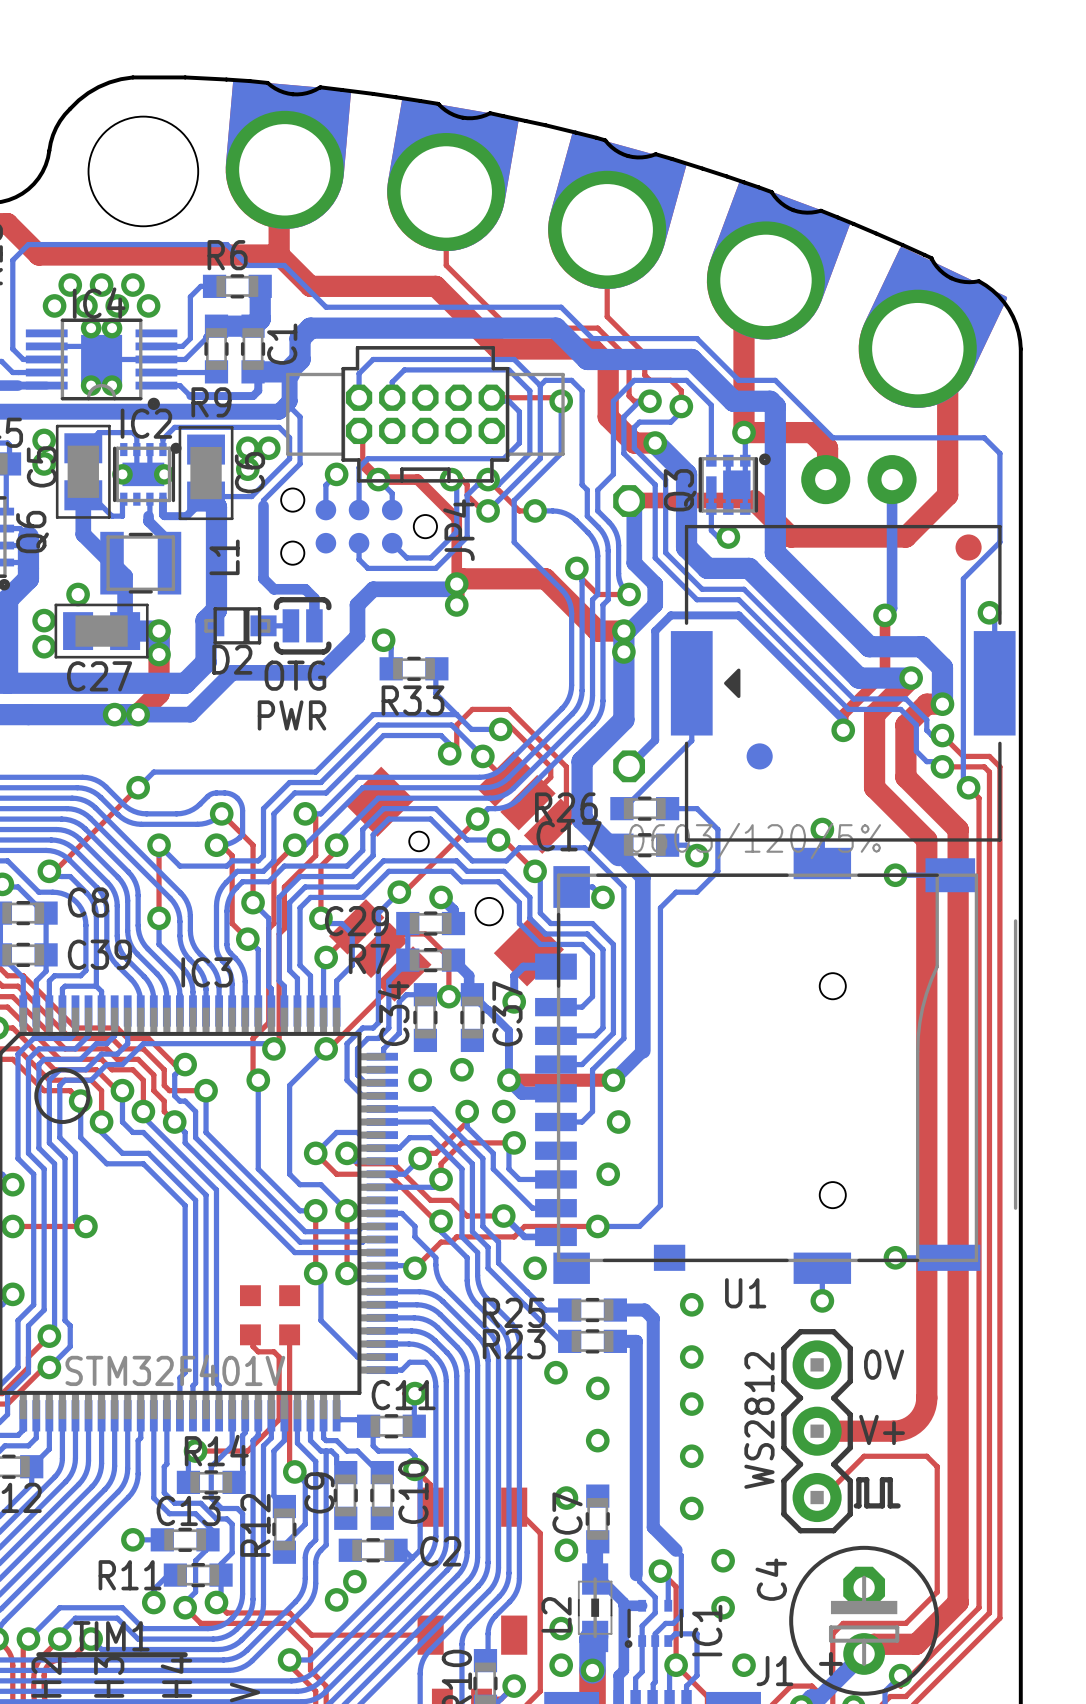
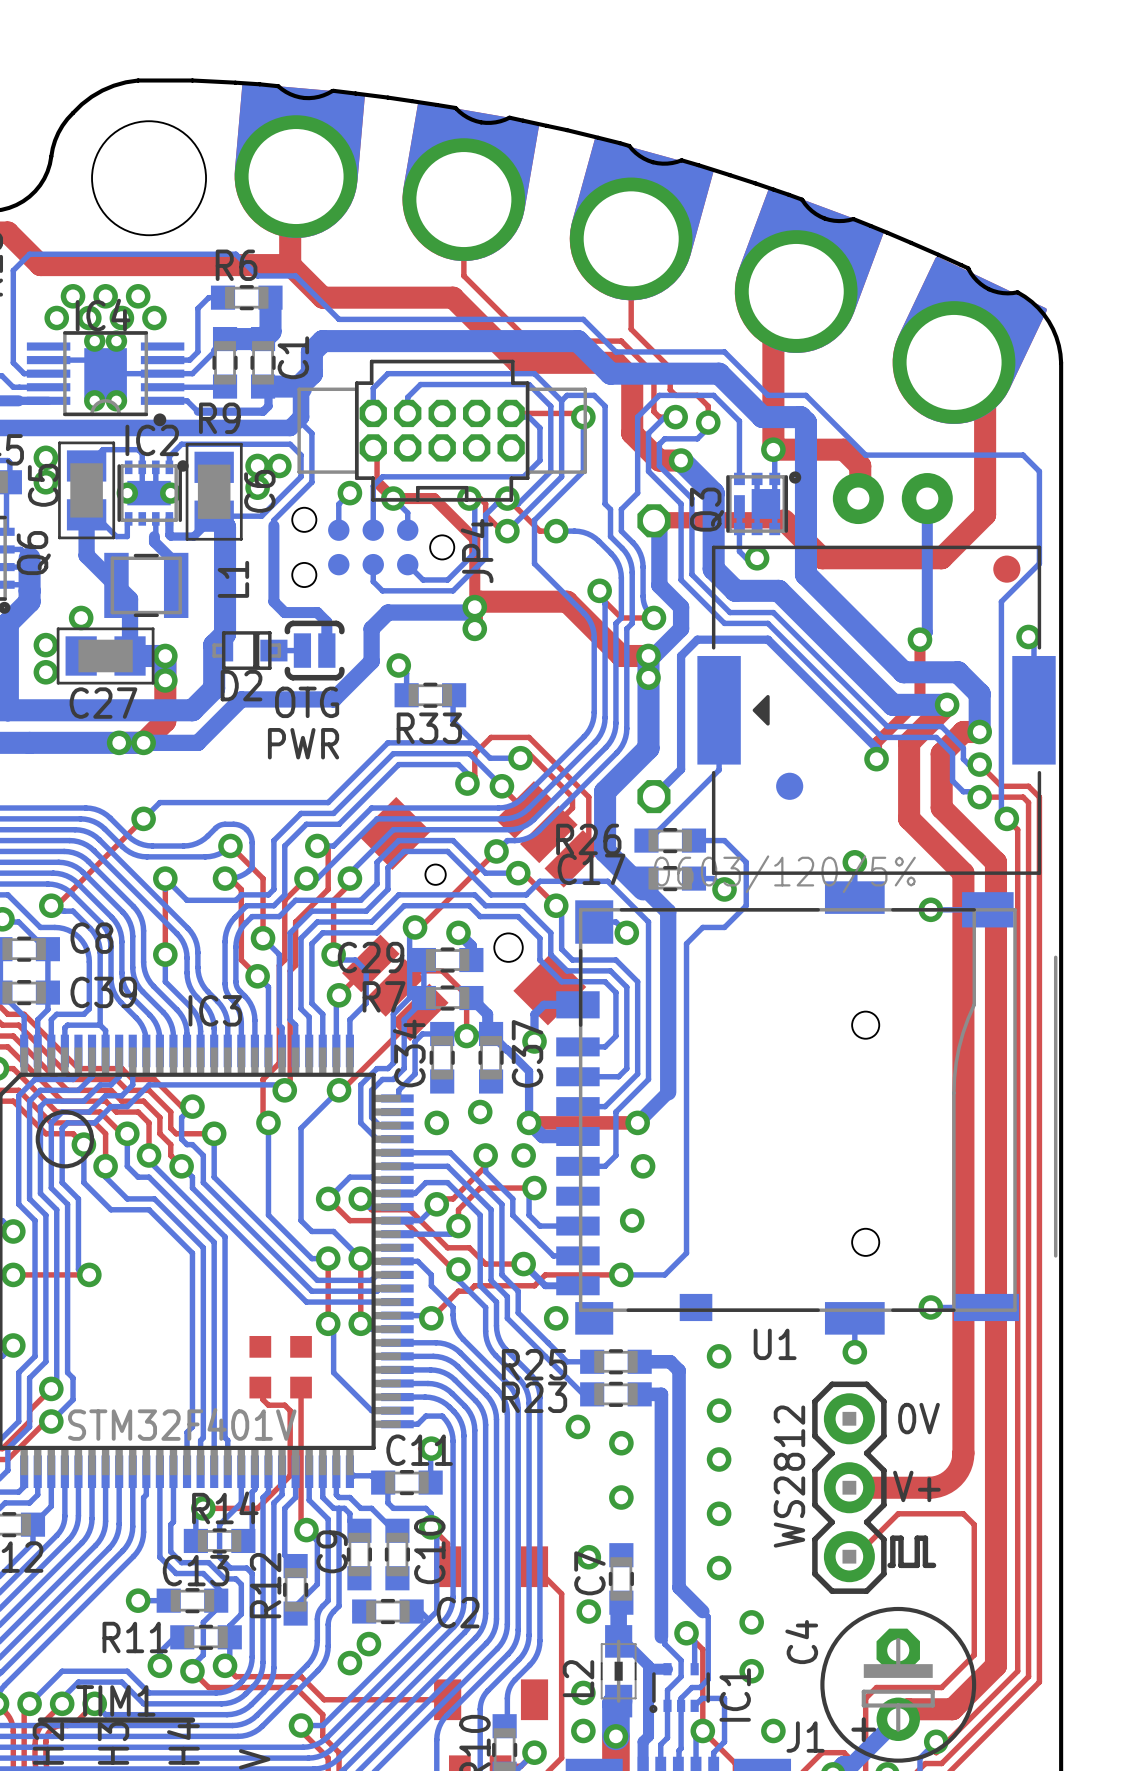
bottom track: (394, 897) (378, 913) (378, 975) -> (409, 932) (409, 998) (393, 1014)

